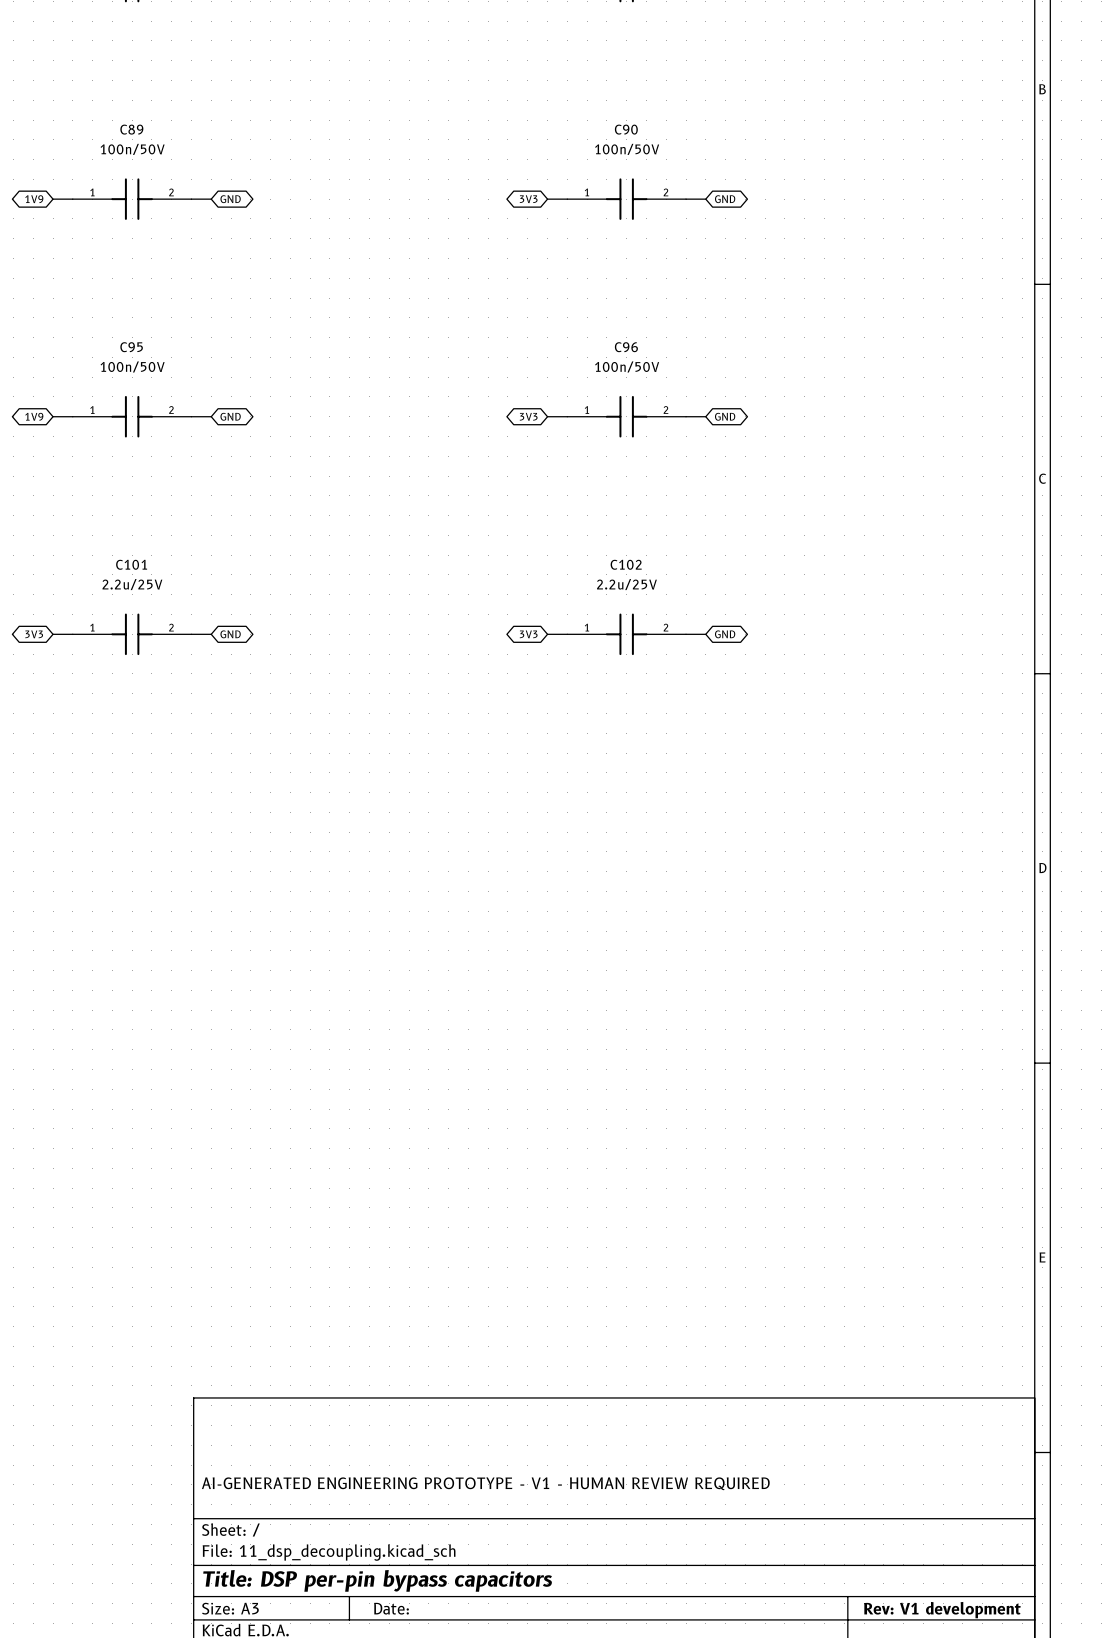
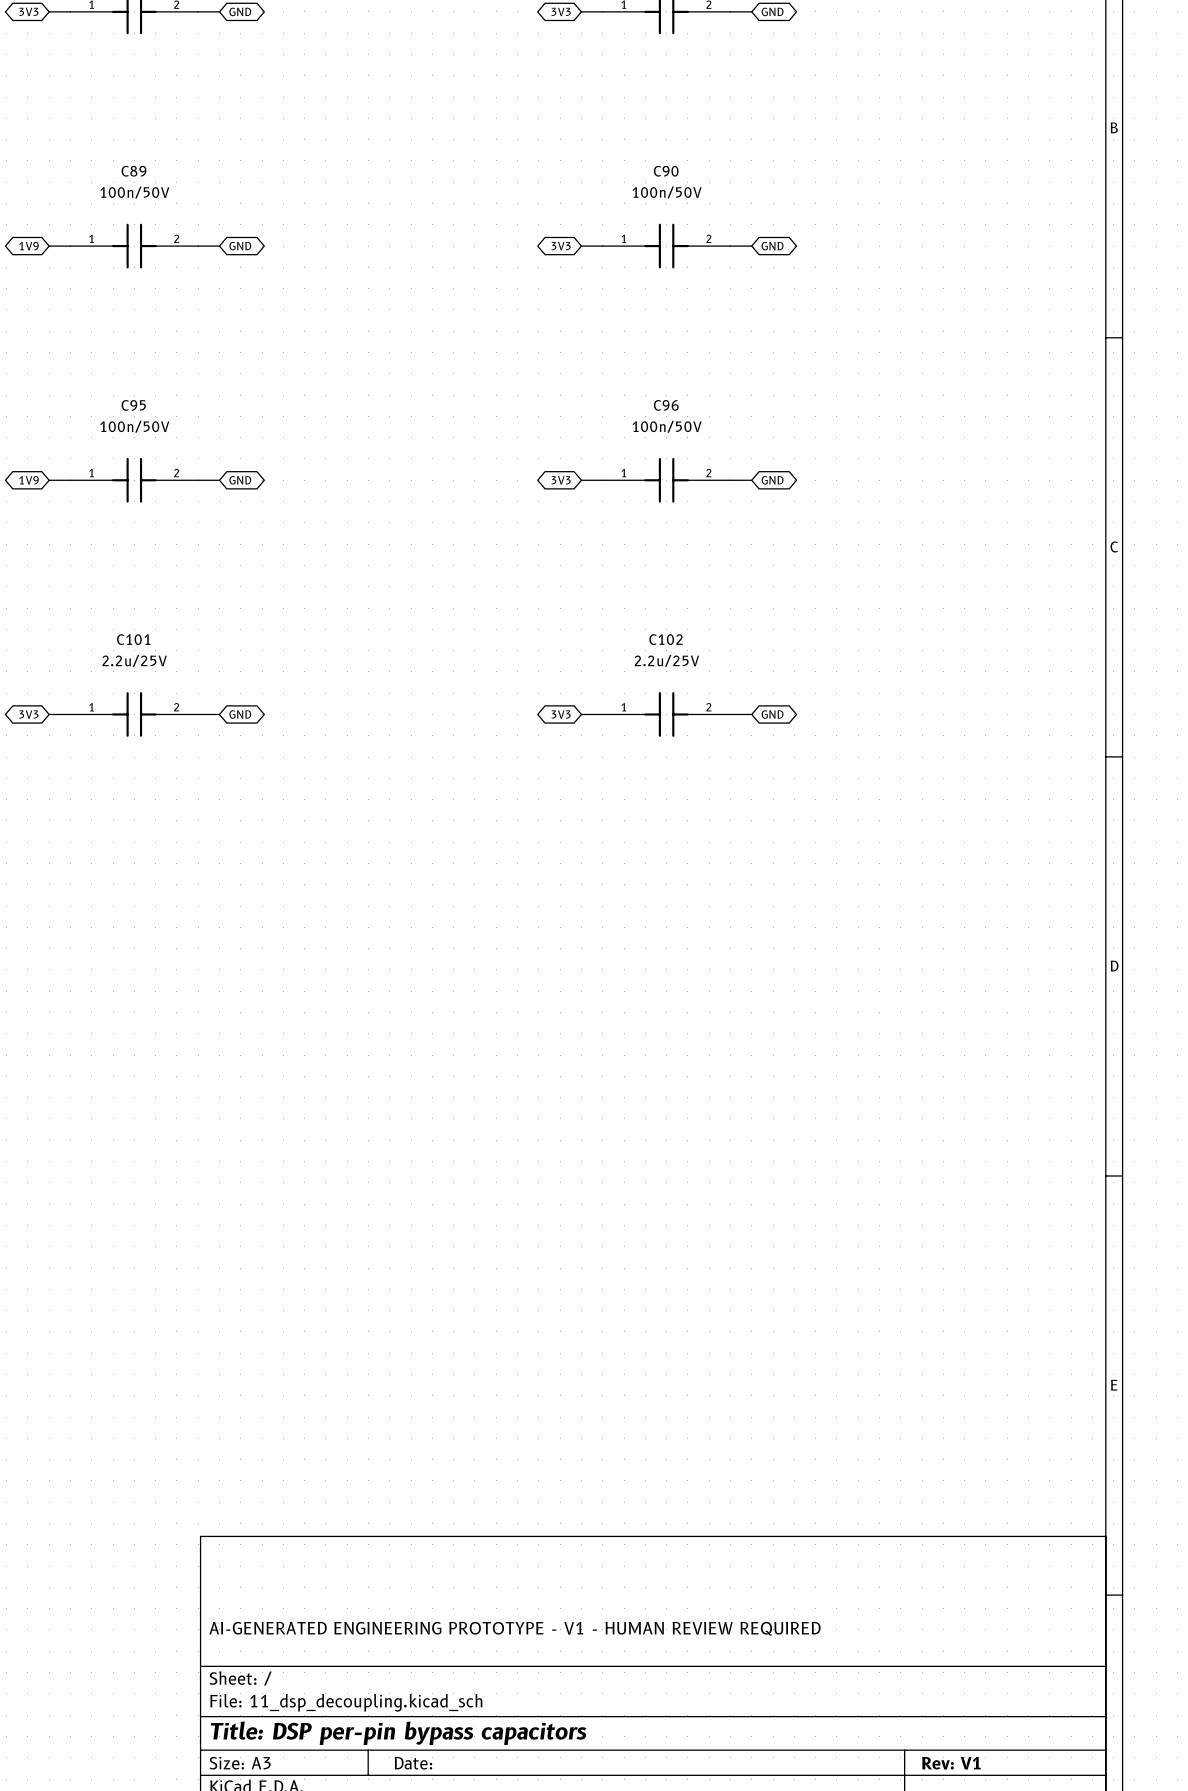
title block: Rev: V1 development (942, 1610) -> Rev: V1 (951, 1763)

